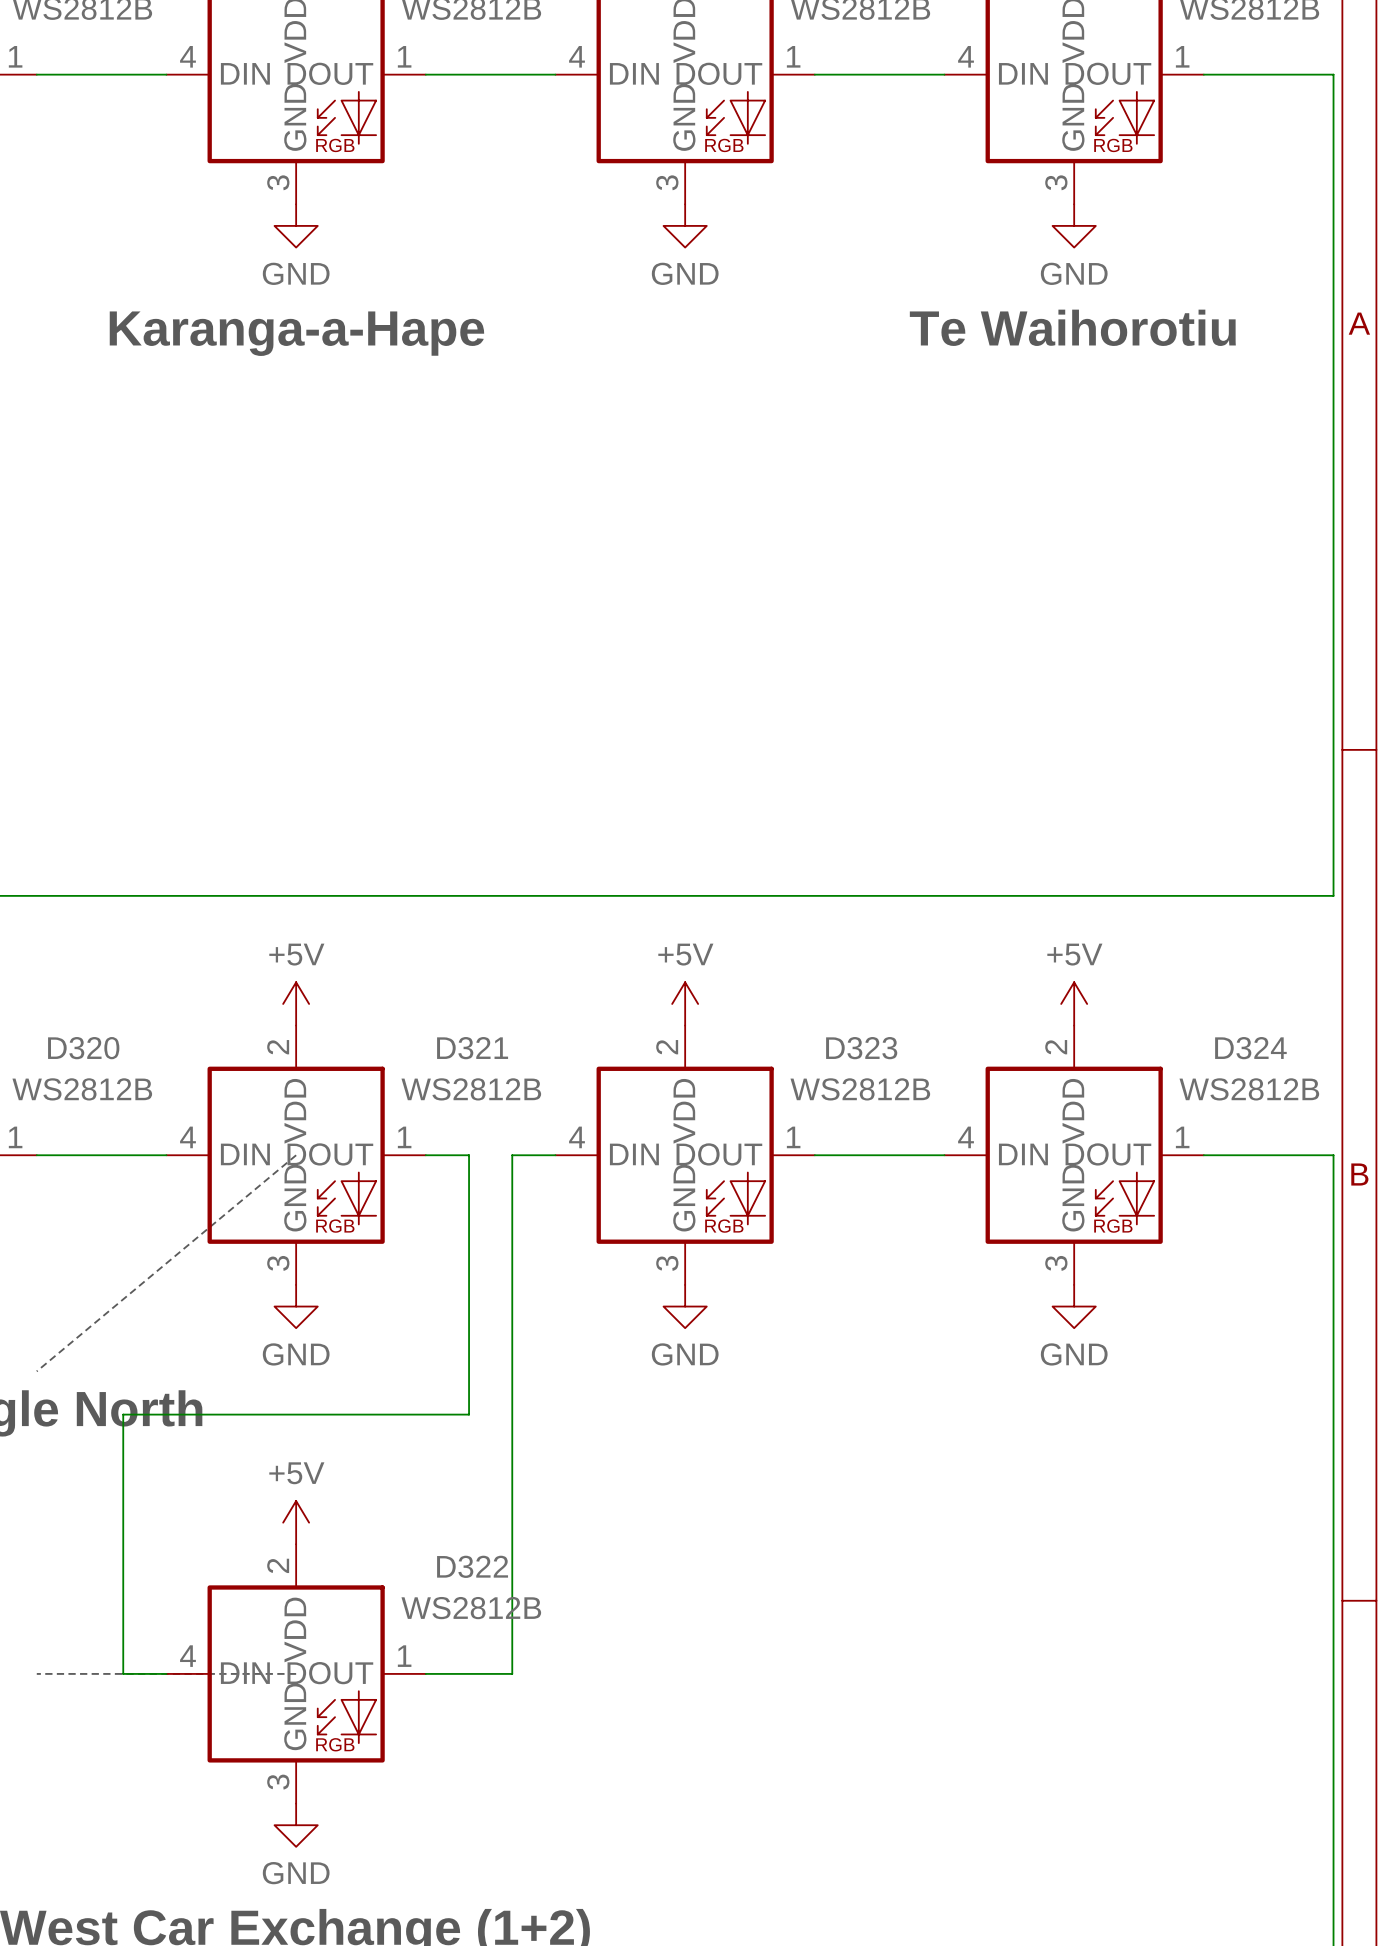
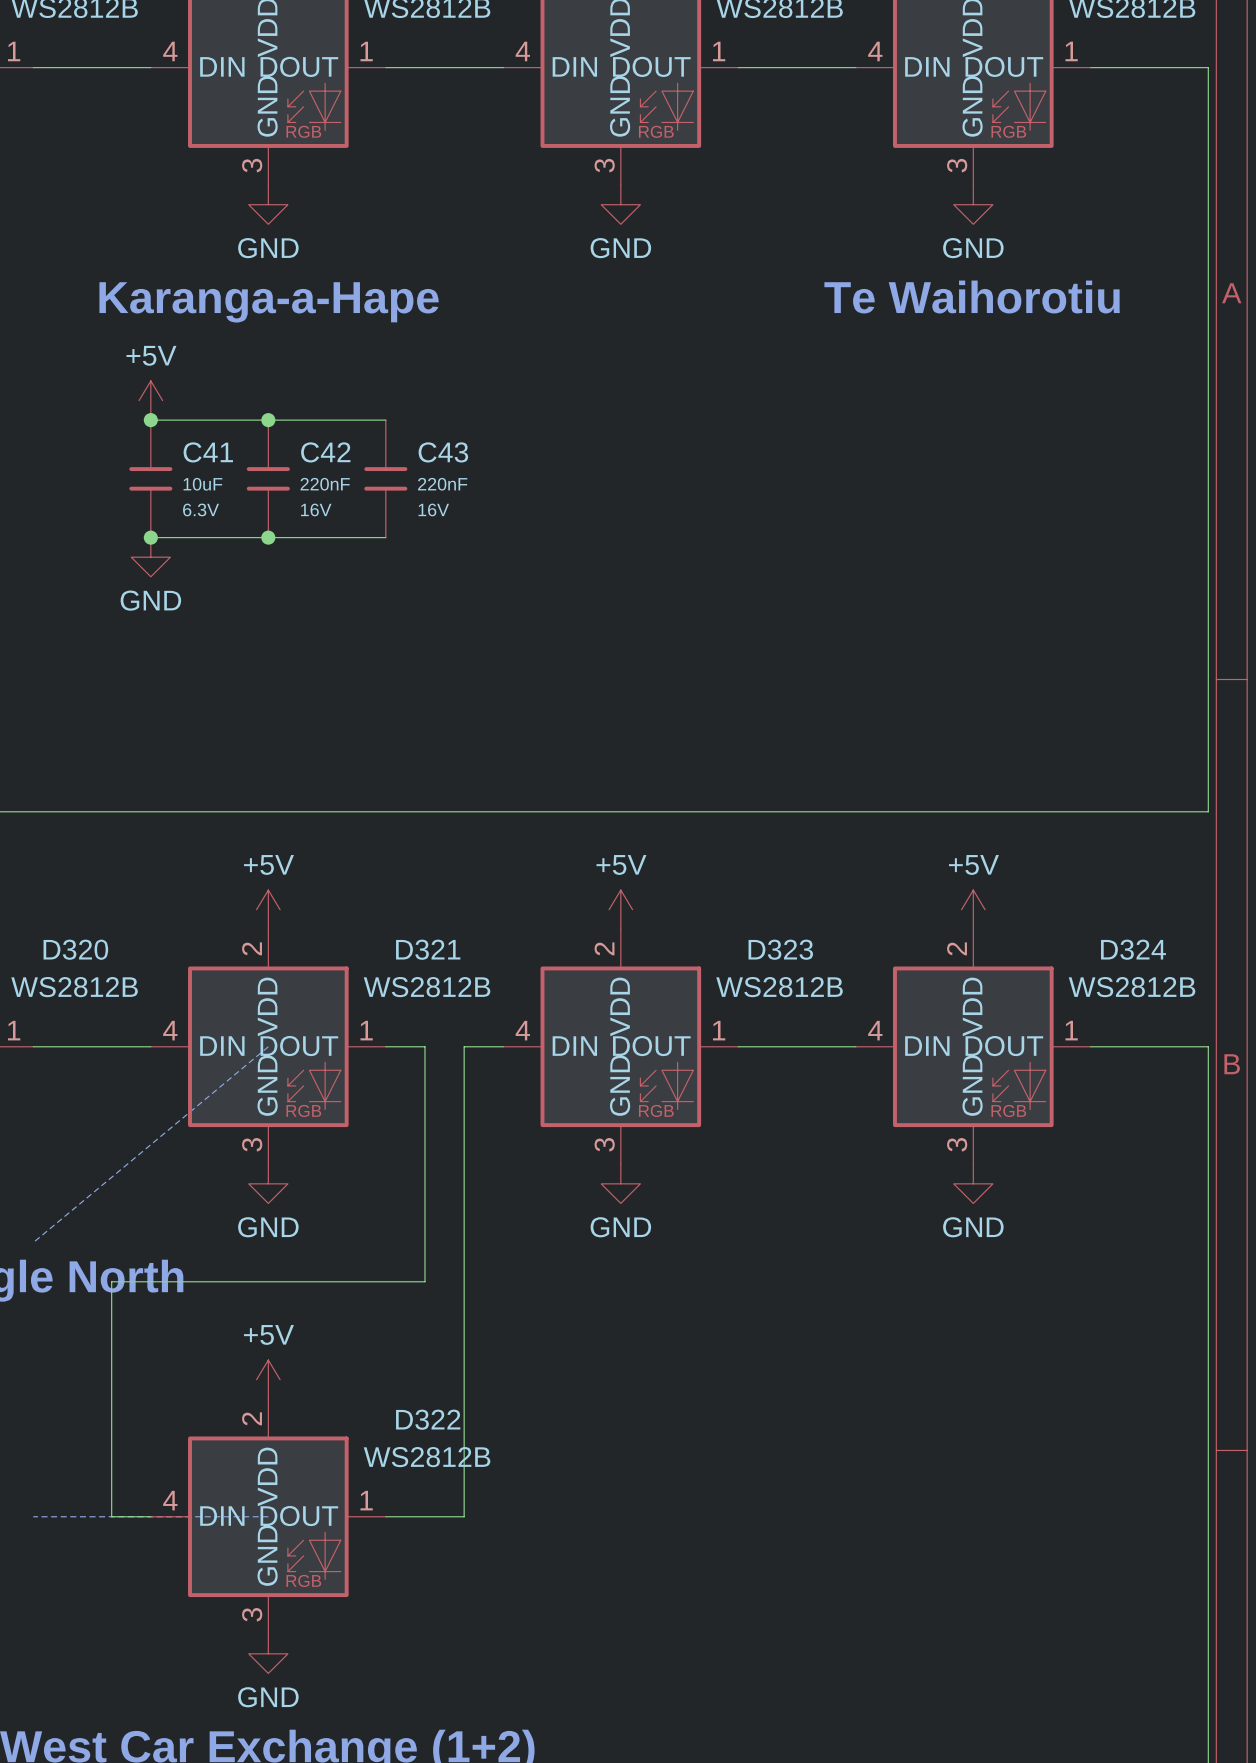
power symbol: none -> +5V (150, 400)
wire: none -> (150, 420) (385, 420)
junction: none -> (150, 420)
junction: none -> (268, 420)
C41: none -> 10uF (150, 478)
C42: none -> 220nF (268, 478)
C43: none -> 220nF (385, 478)
wire: none -> (150, 537) (385, 537)
junction: none -> (150, 537)
junction: none -> (268, 537)
power symbol: none -> GND (150, 557)

